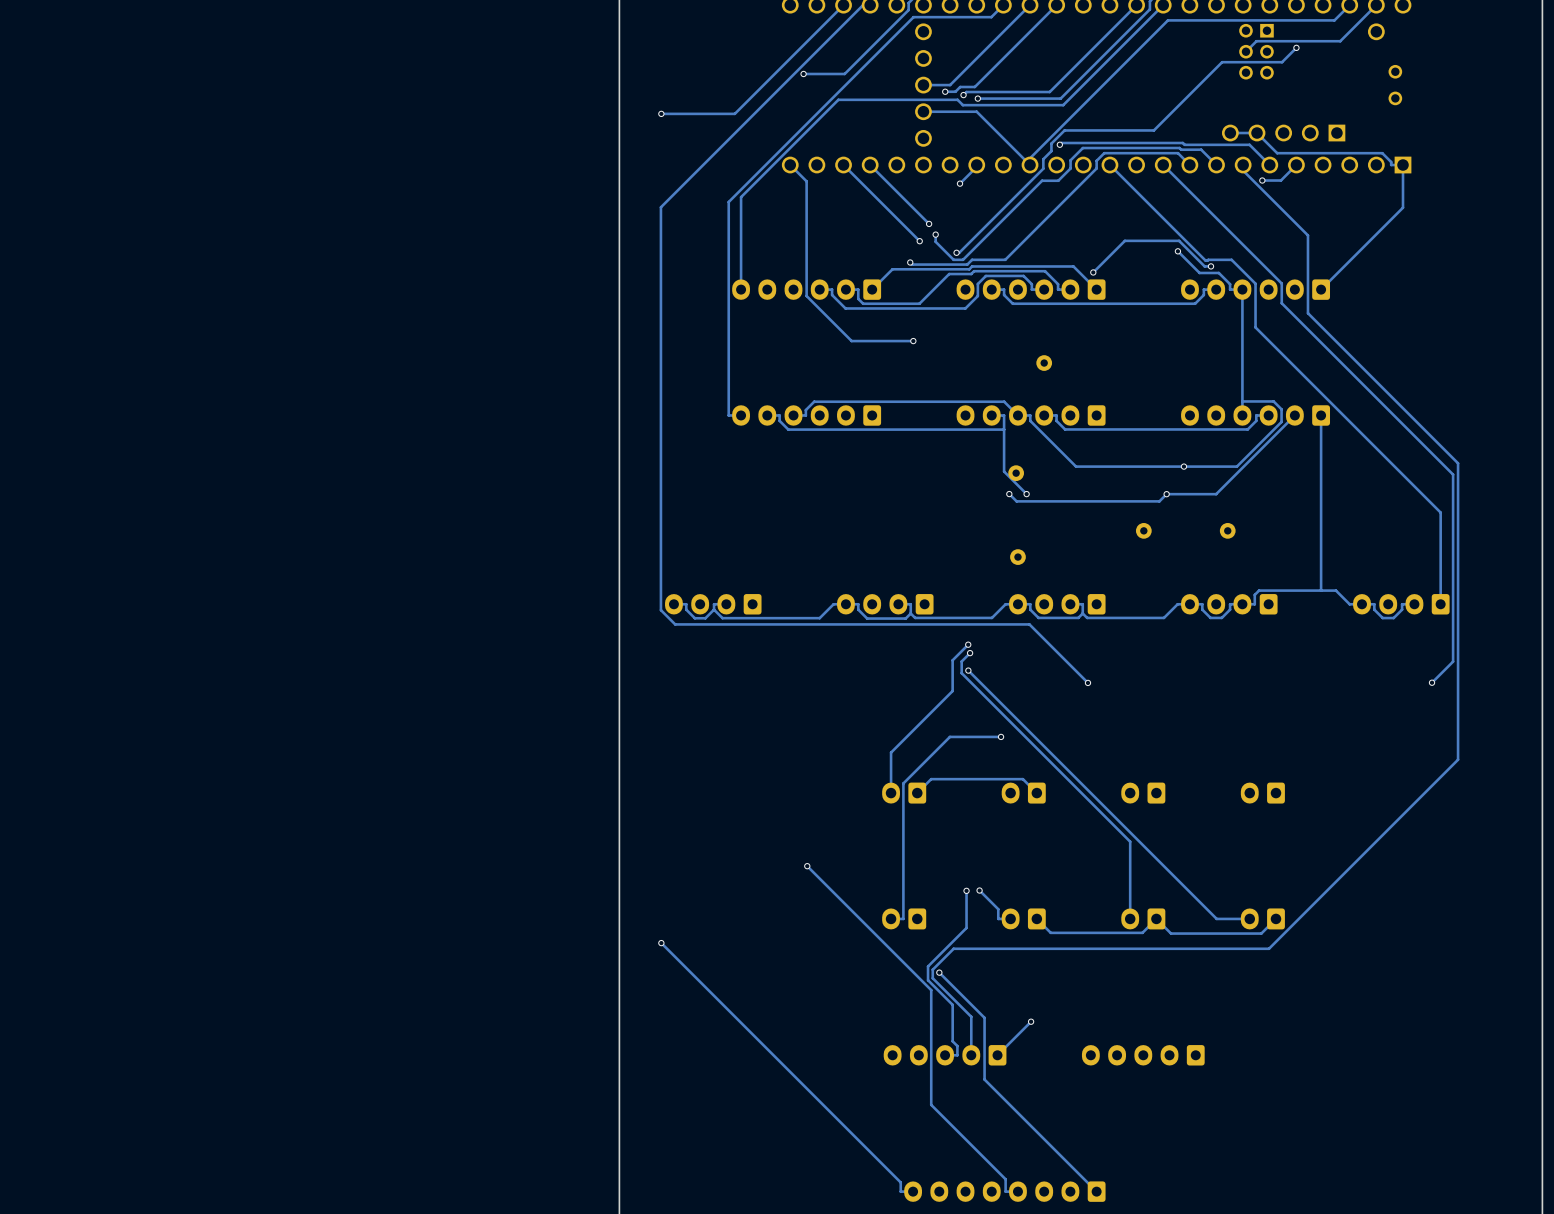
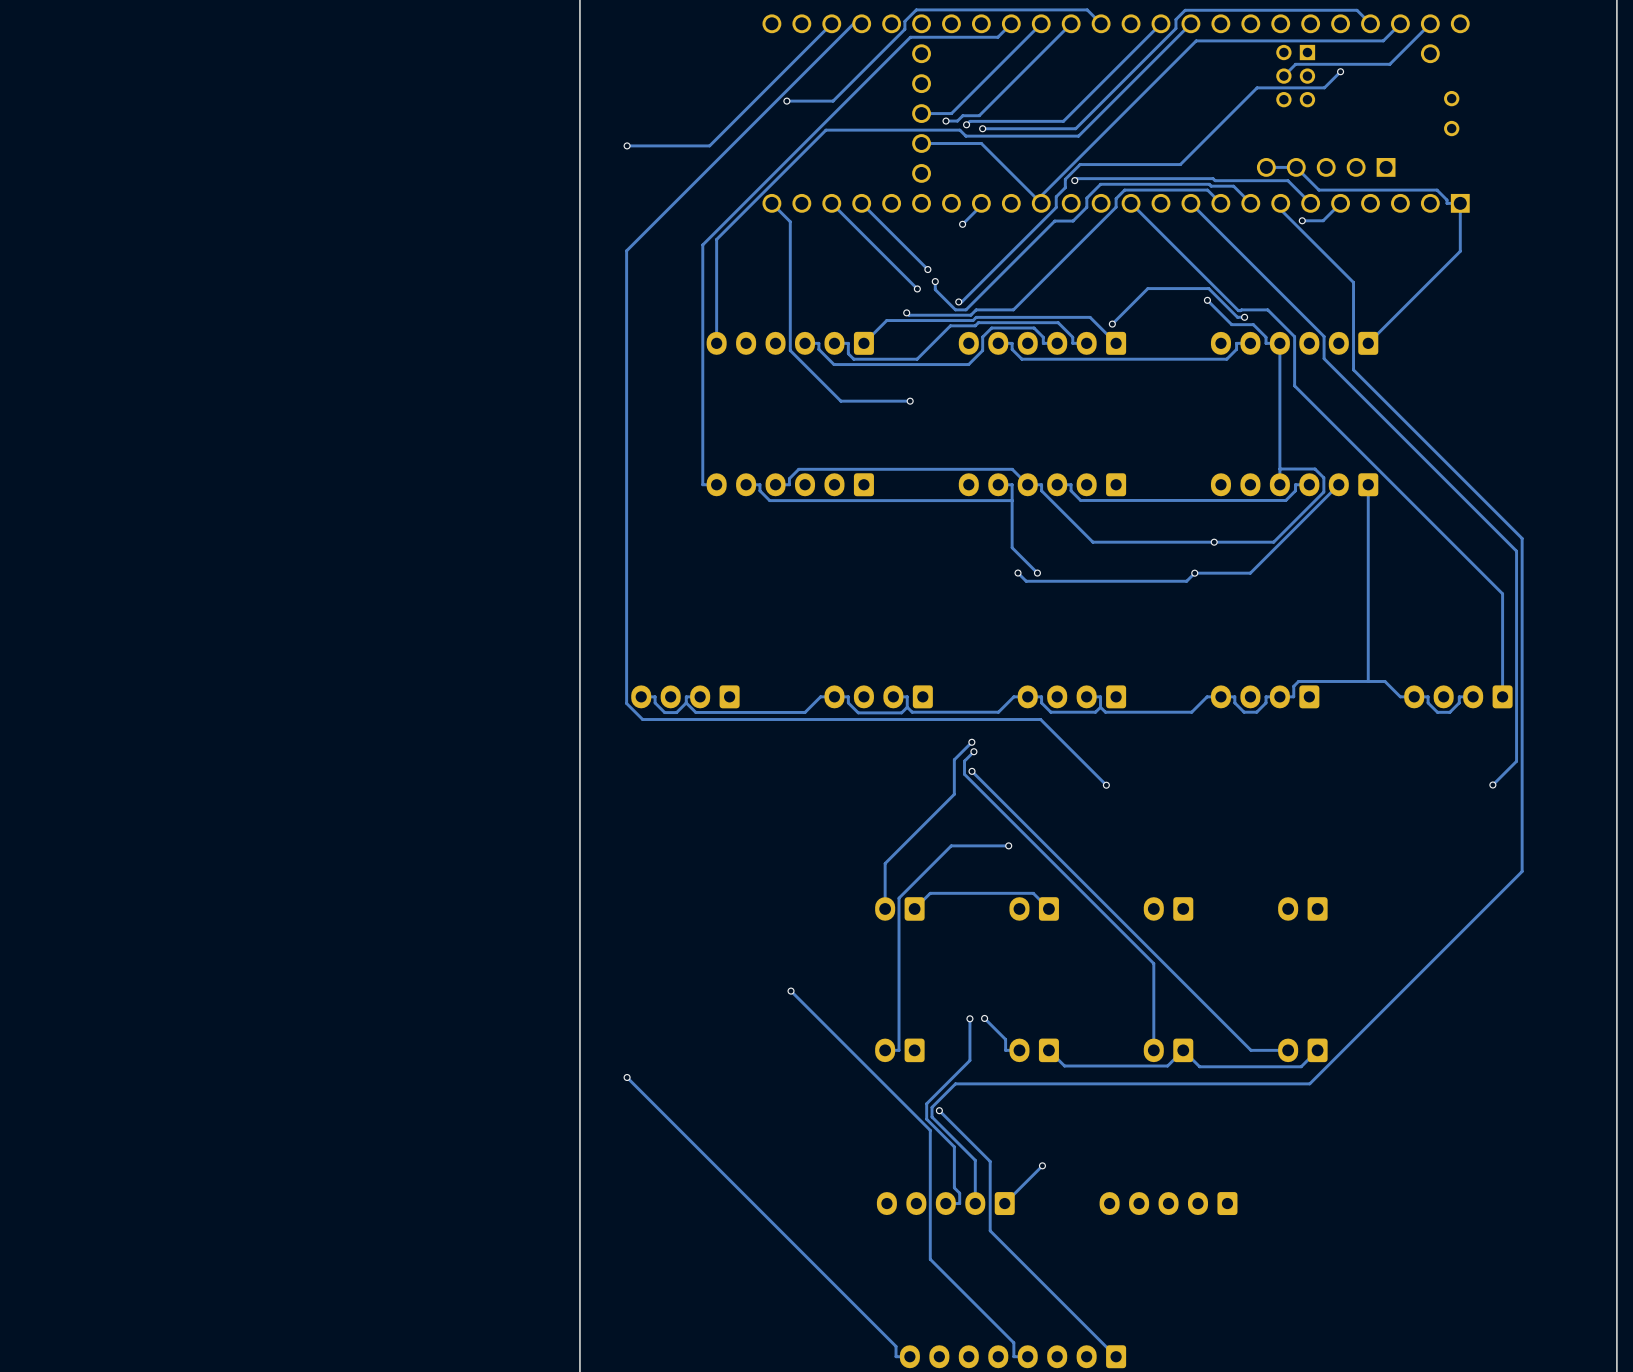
part: (1044, 363) -> none
part: (1016, 473) -> none
part: (1143, 530) -> none
part: (1227, 530) -> none
part: (1017, 557) -> none

